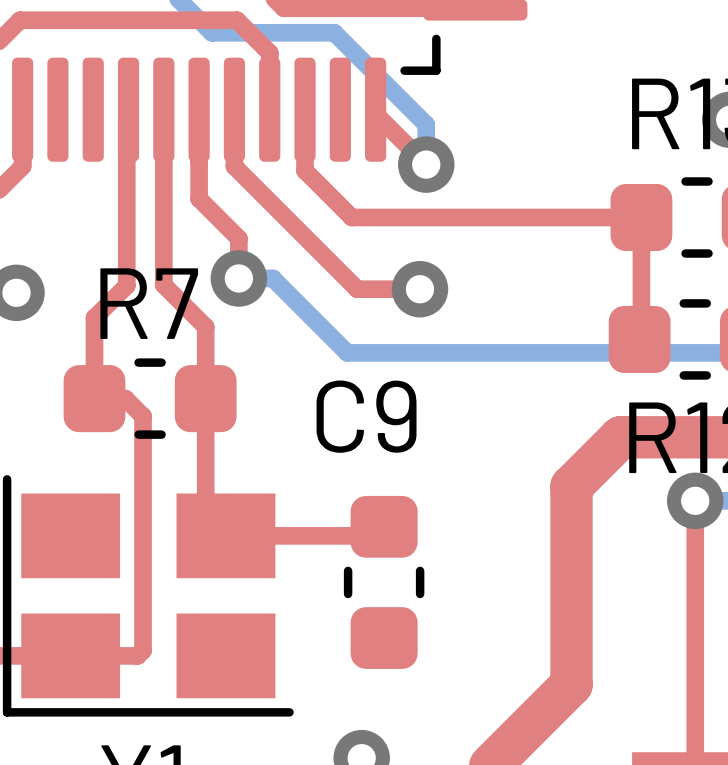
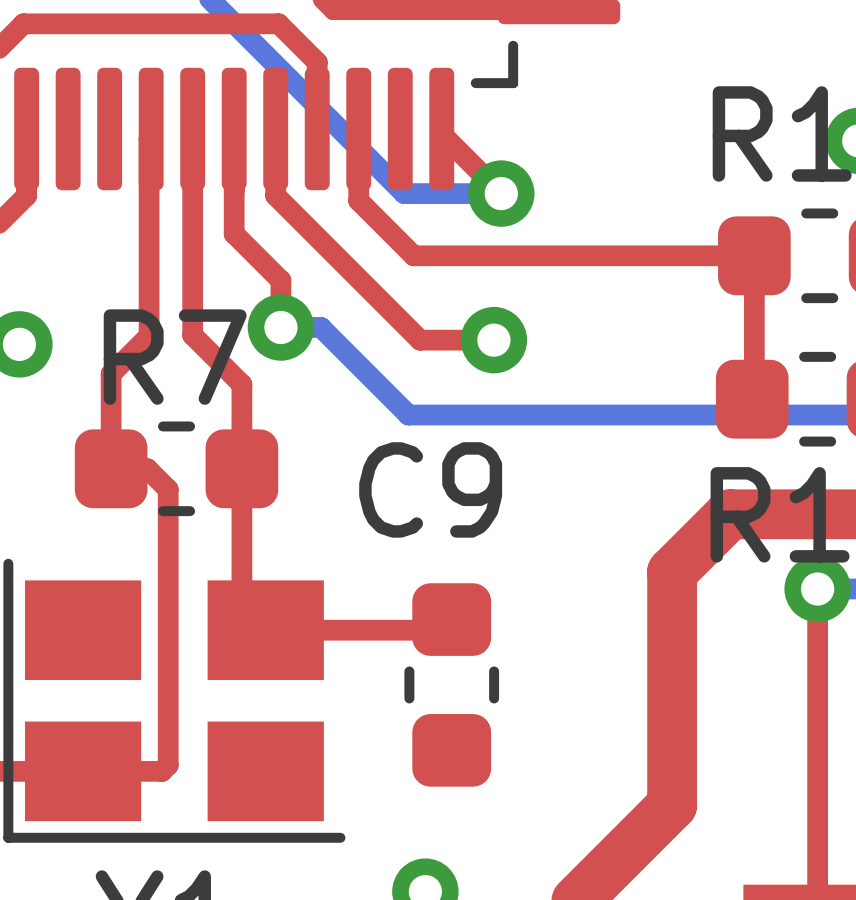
bottom track: (211, 32) (334, 32) (426, 124) (426, 164) -> (249, 38) (404, 193) (501, 193)

